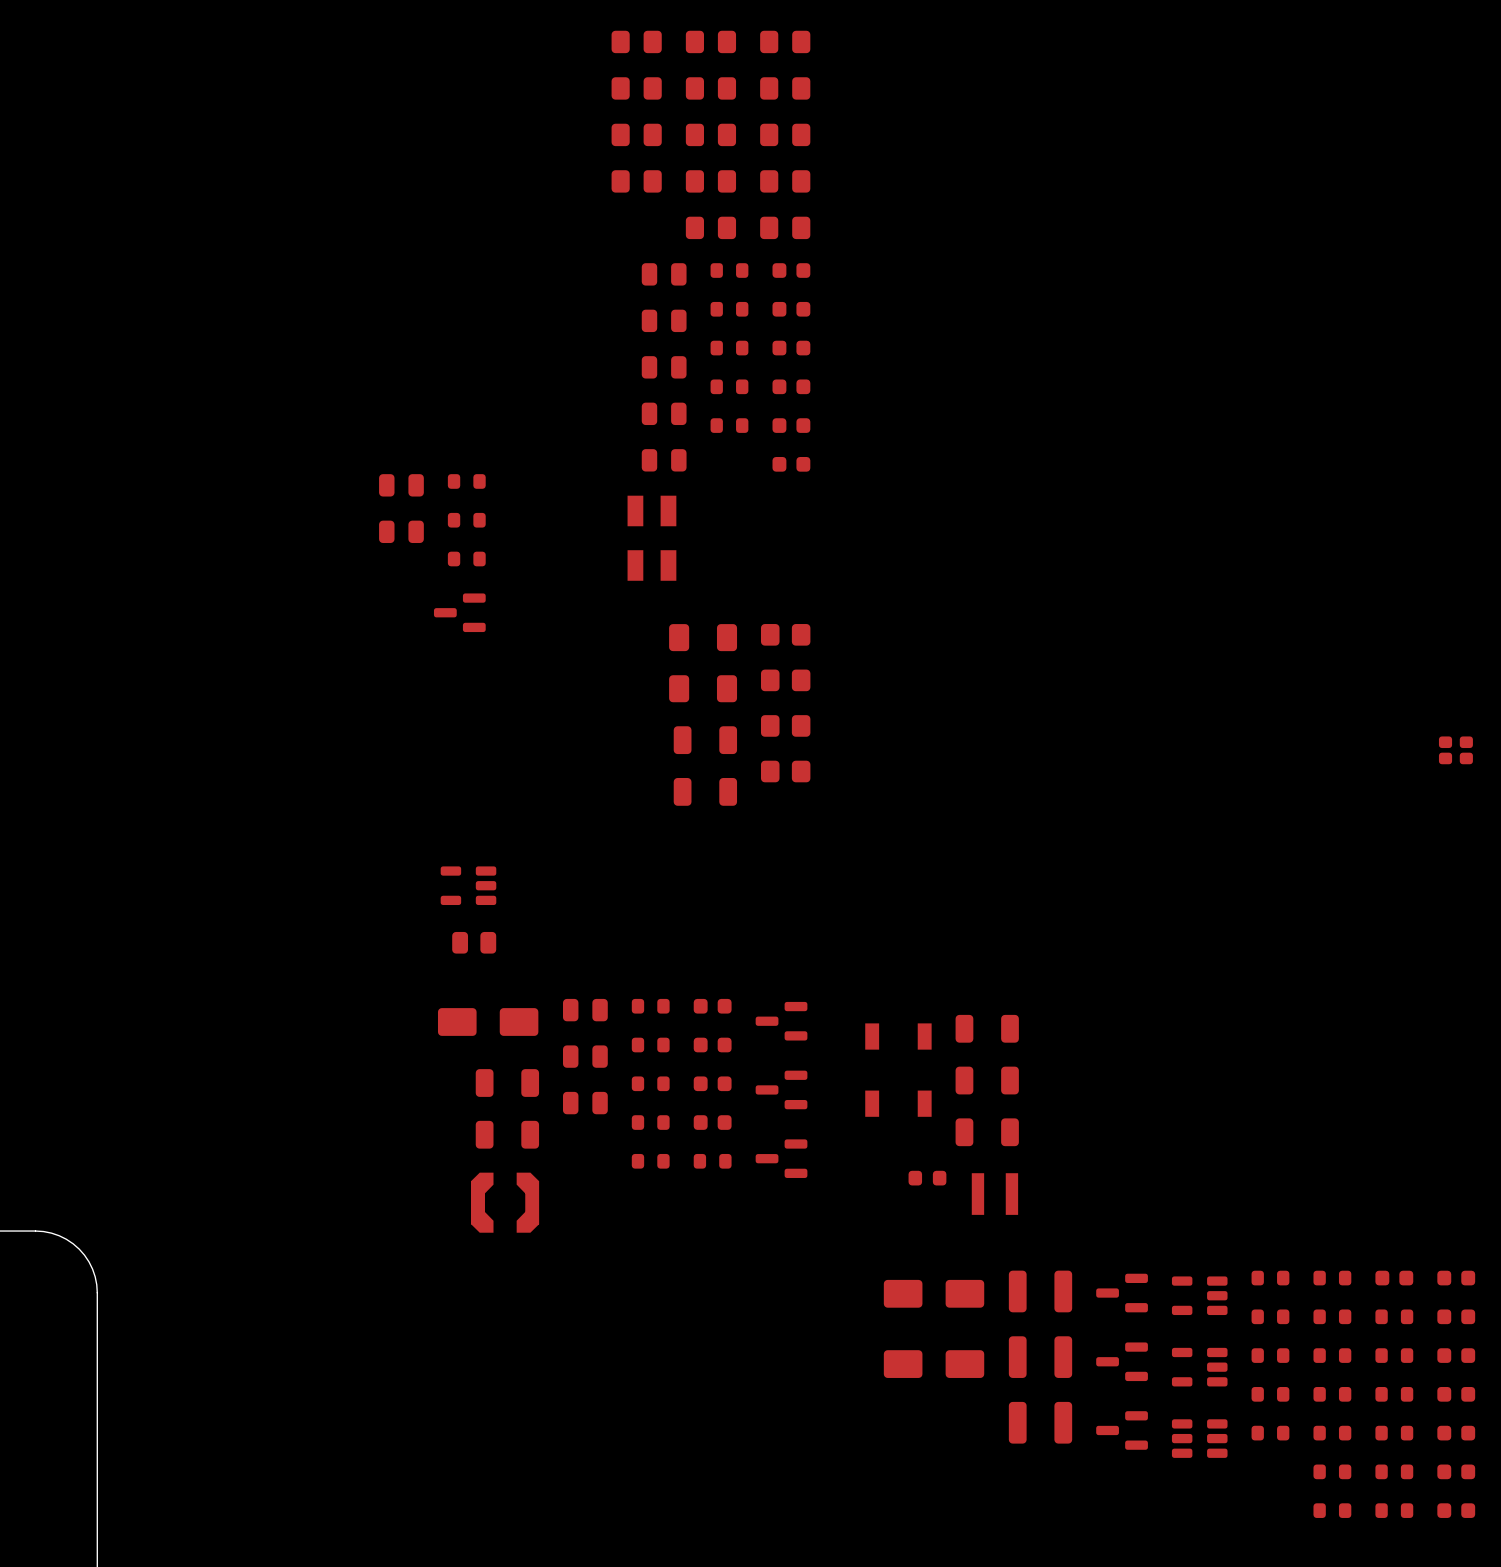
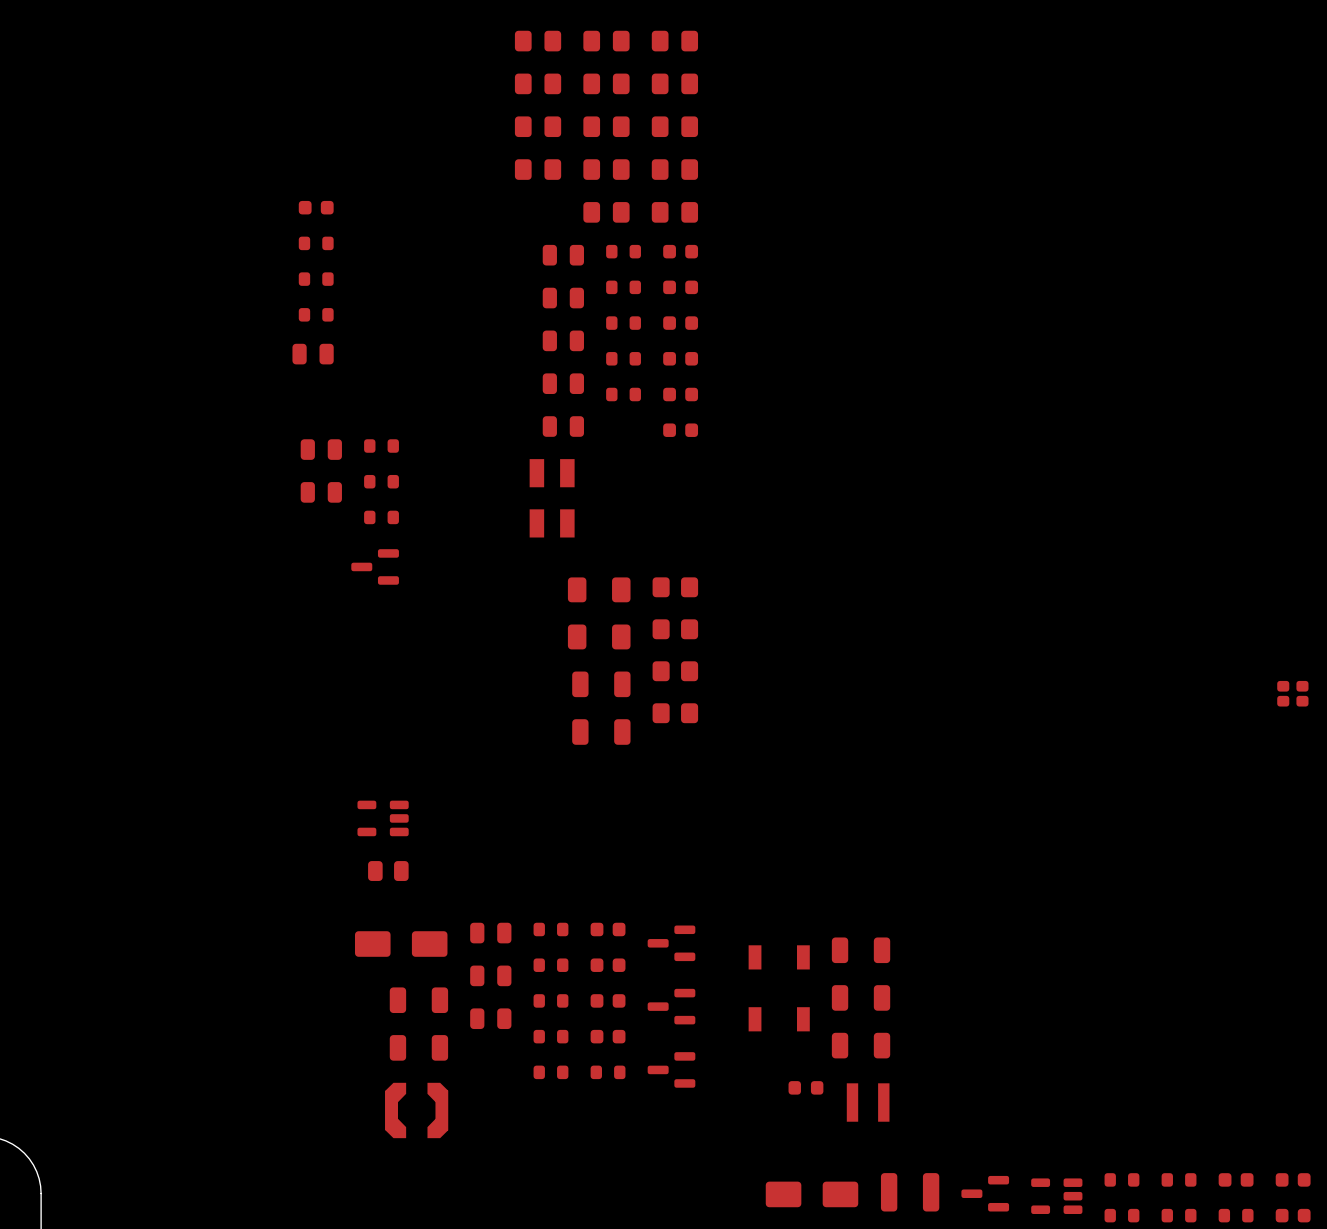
part: none -> (316, 207)
part: none -> (316, 243)
part: none -> (316, 279)
part: none -> (316, 314)
part: none -> (313, 354)

